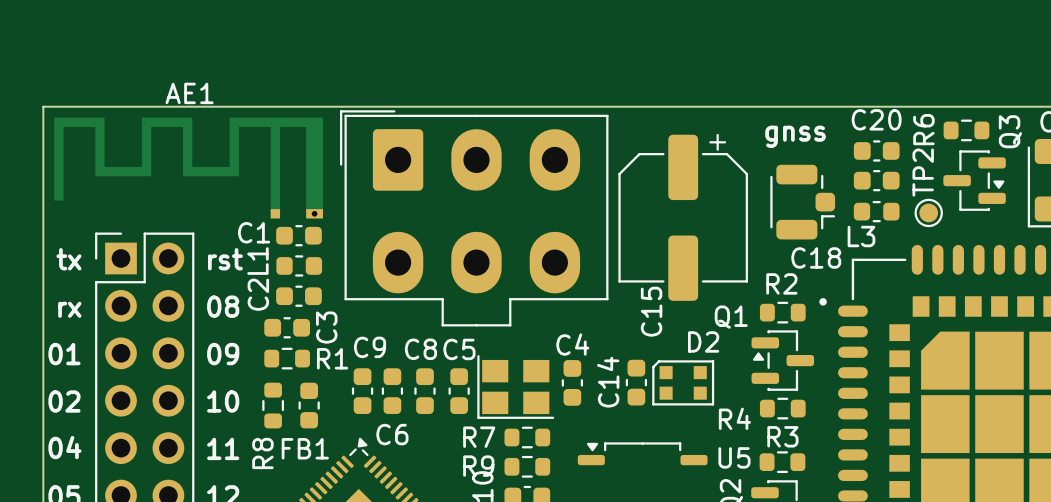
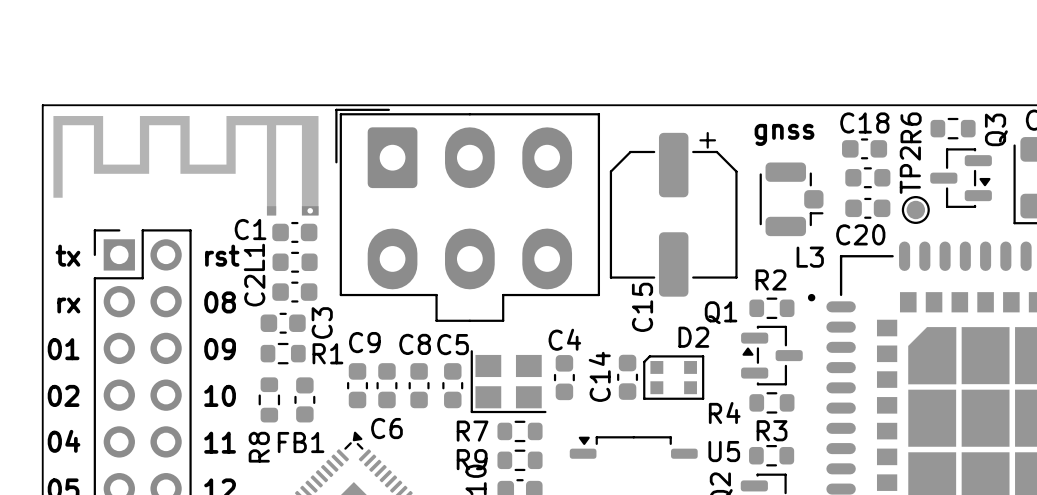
AE1 name: AE1 (189, 93) -> none
C20 name: C20 (876, 119) -> C18 (864, 122)
C18: (876, 180) -> none
L3 position: (876, 211) -> (867, 177)
C20: none -> (867, 208)
L3 name position: L3 (861, 236) -> L3 (810, 257)

